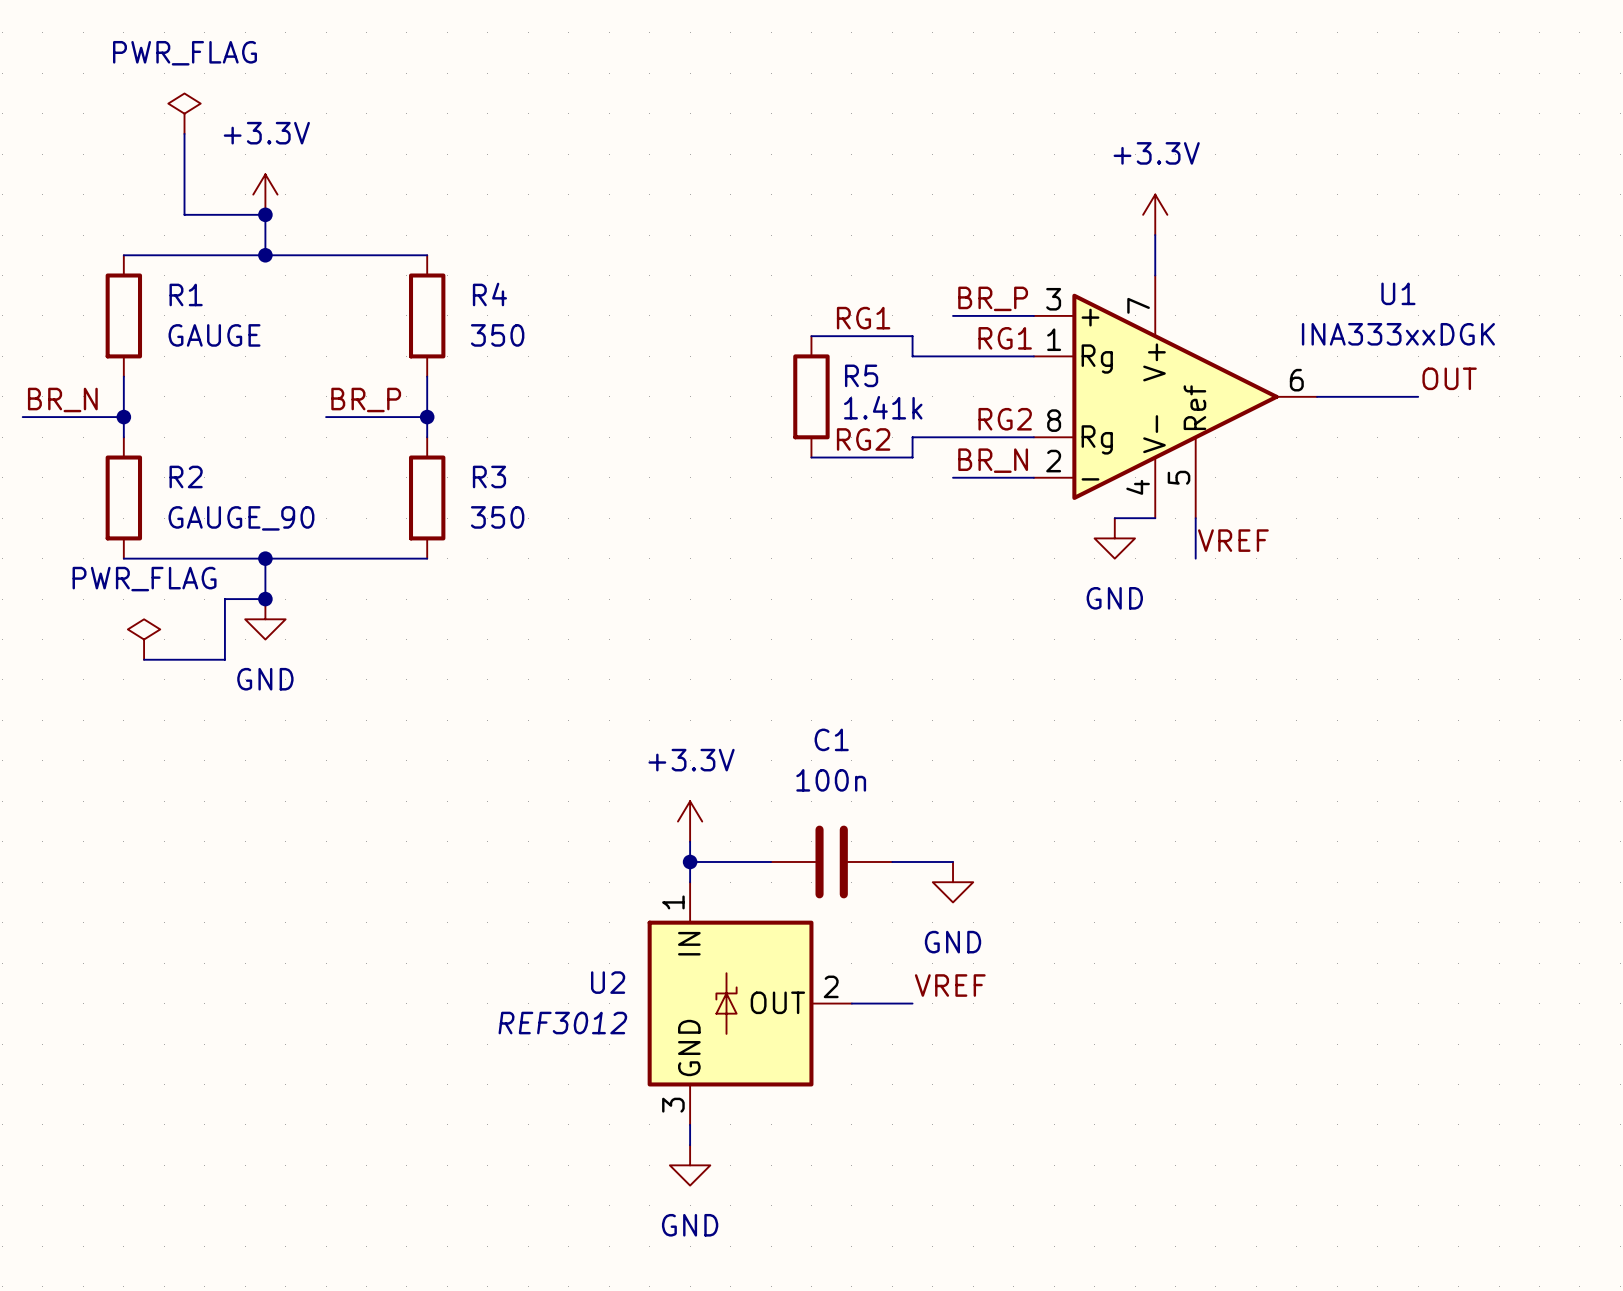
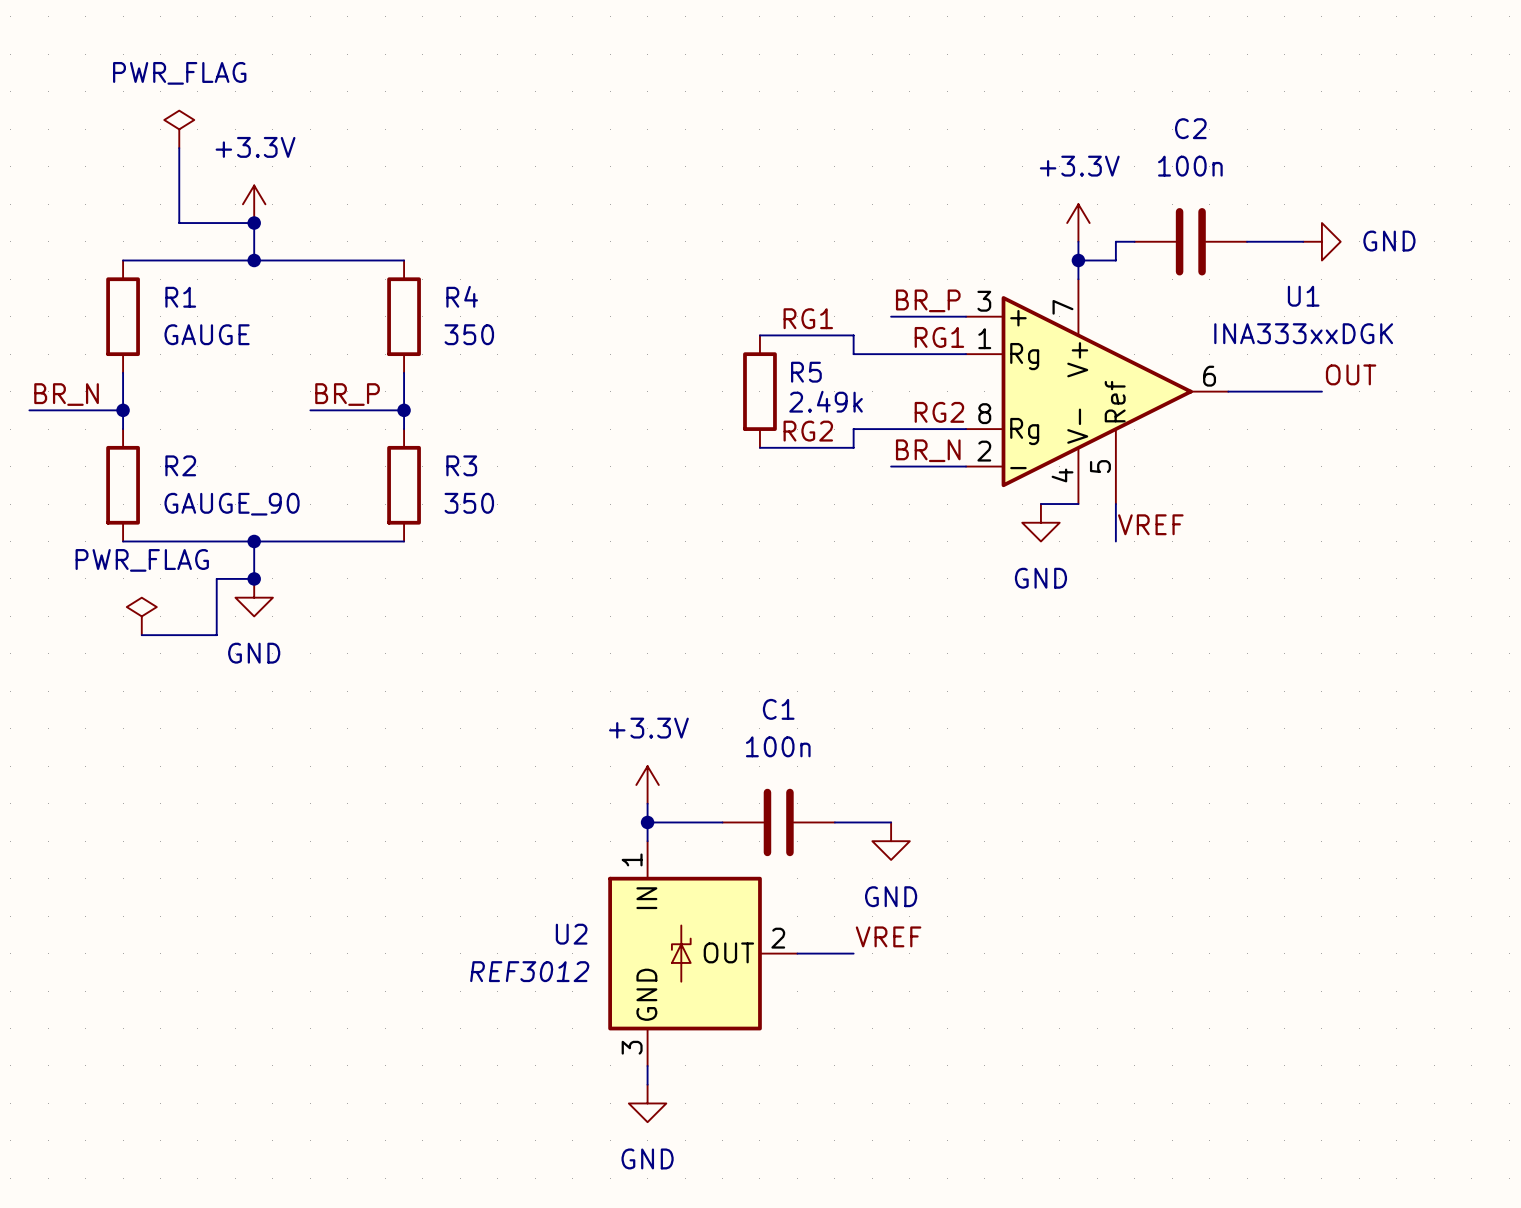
wire: none -> (1134, 241) (1115, 241) (1115, 260) (1078, 260)
C2: none -> 100n (1190, 241)
wire: none -> (1247, 241) (1303, 241)
power symbol: none -> GND (1321, 241)
junction: none -> (1078, 260)
R5 value: 1.41k (883, 407) -> 2.49k (826, 401)

